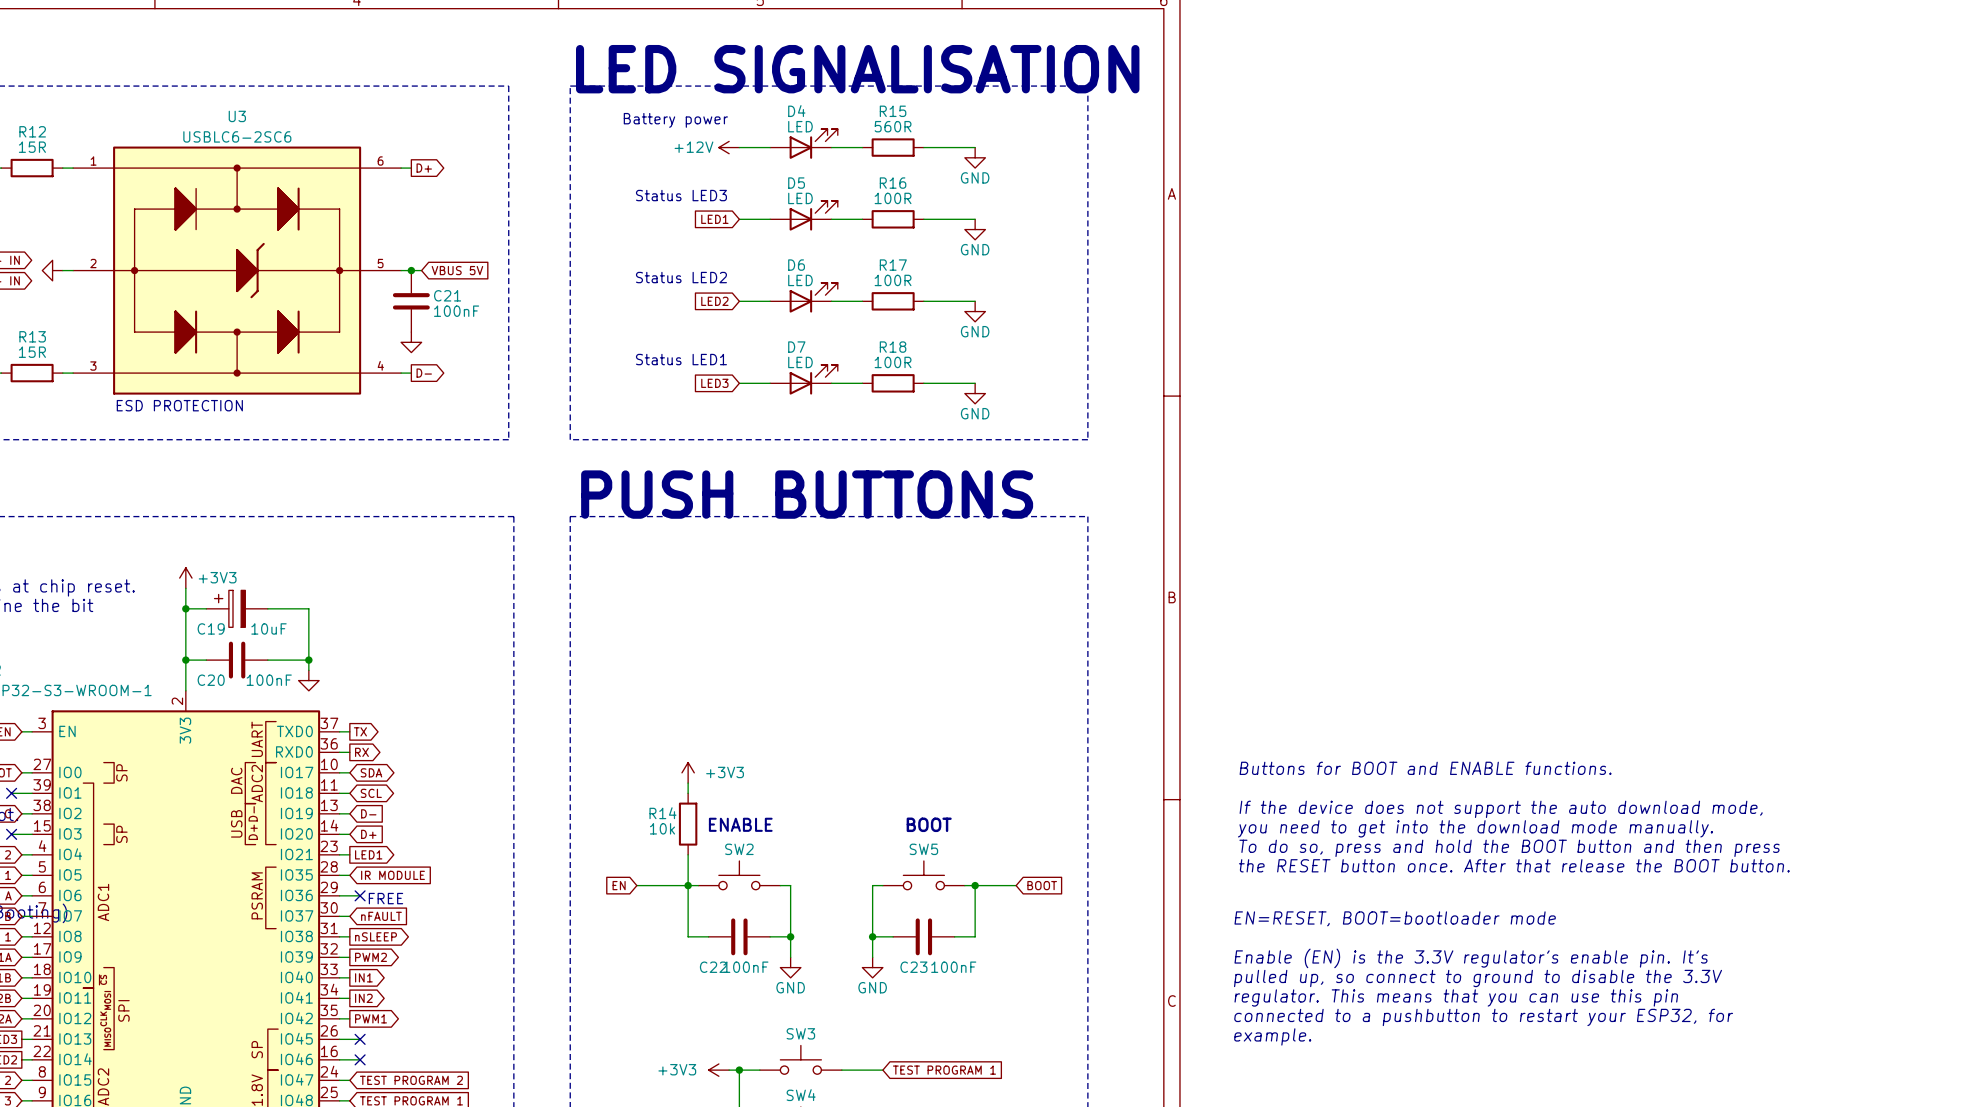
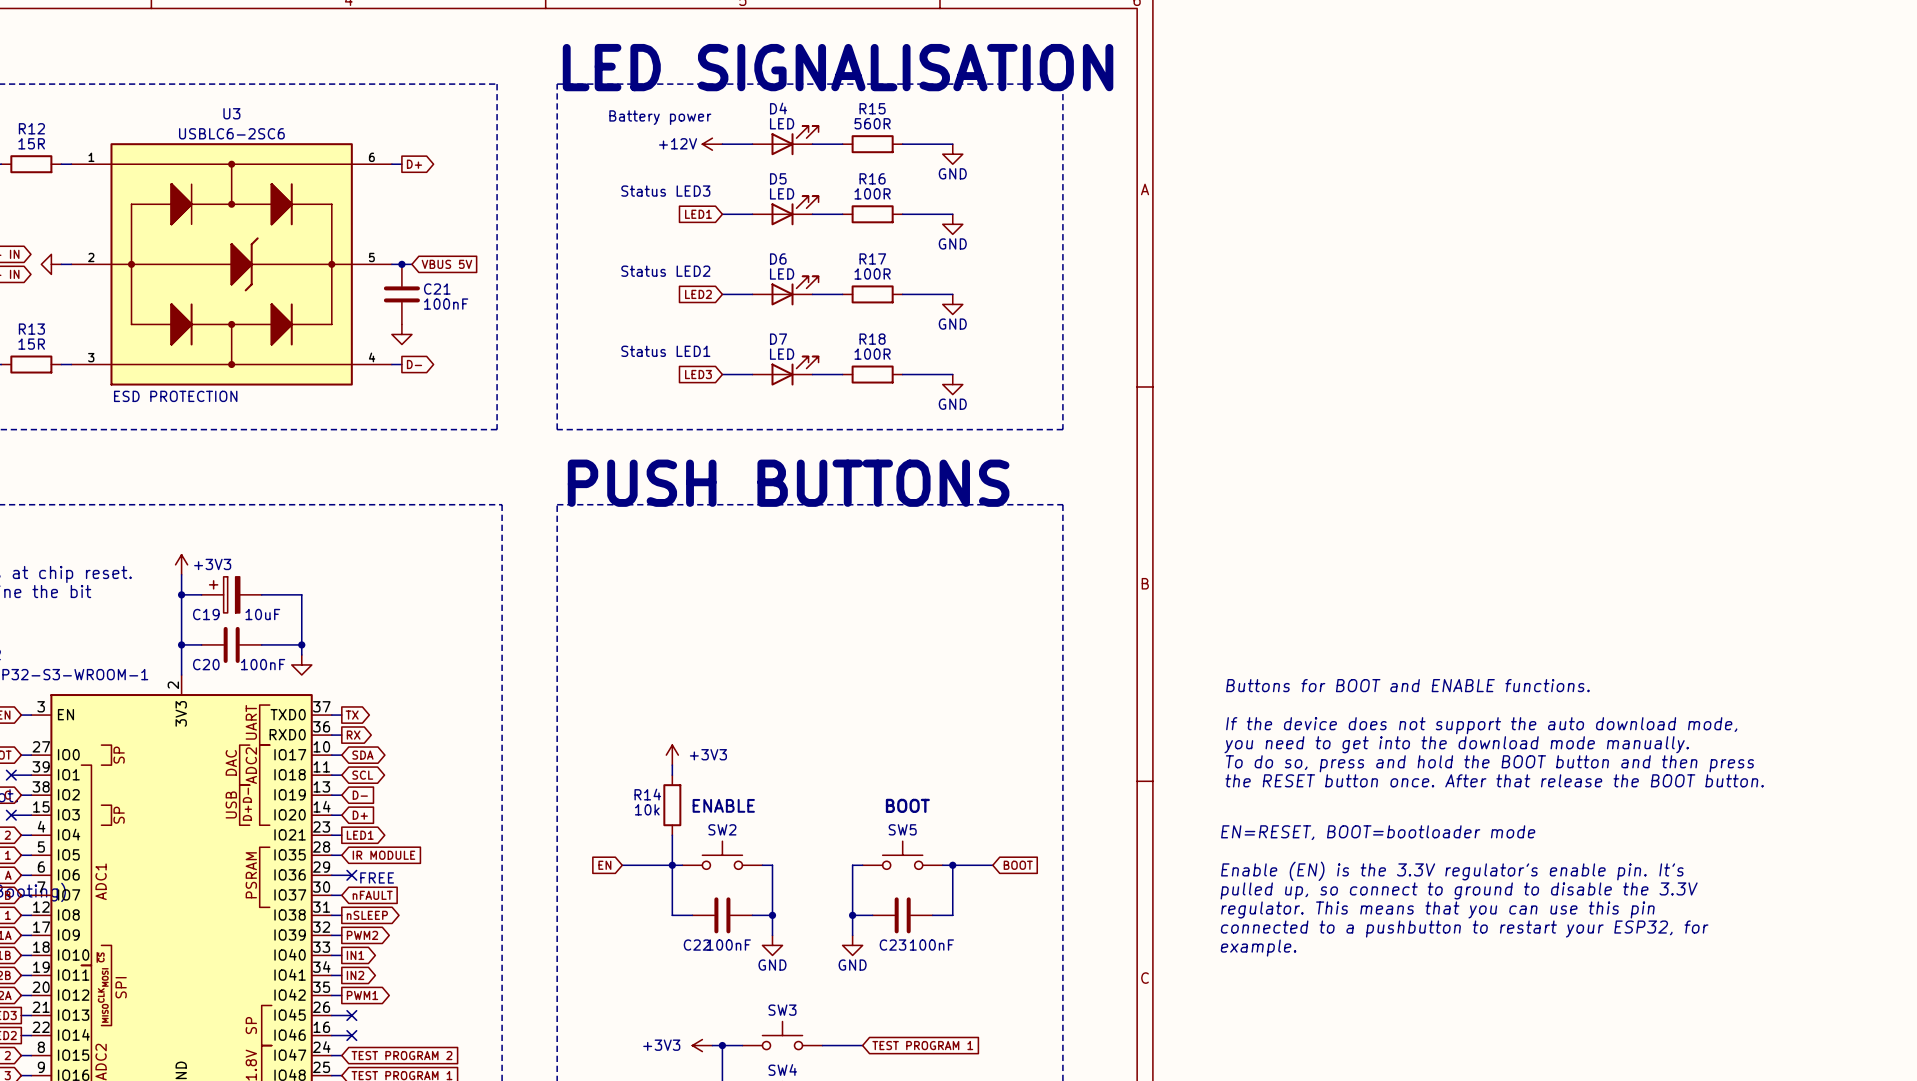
text position: Buttons for BOOT and ENABLE functions. (1425, 768) -> Buttons for BOOT and ENABLE functions. (1407, 685)
text position: If the device does not support the auto download mode, (1501, 809) -> If the device does not support the auto download mode, (1481, 725)
text position: you need to get into the download mode manually. (1475, 828) -> you need to get into the download mode manually. (1456, 744)
text position: To do so, press and hold the BOOT button and then press (1509, 848) -> To do so, press and hold the BOOT button and then press (1489, 763)
text position: the RESET button once. After that release the BOOT button. (1514, 865) -> the RESET button once. After that release the BOOT button. (1494, 780)
text position: EN=RESET, BOOT=bootloader mode (1395, 918) -> EN=RESET, BOOT=bootloader mode (1378, 832)
text position: Enable (EN) is the 3.3V regulator's enable pin. It's (1471, 958) -> Enable (EN) is the 3.3V regulator's enable pin. It's (1452, 871)
text position: pulled up, so connect to ground to disable the 3.3V (1478, 978) -> pulled up, so connect to ground to disable the 3.3V (1459, 890)
text position: regulator. This means that you can use this pin (1456, 997) -> regulator. This means that you can use this pin (1437, 909)
text position: connected to a pushbutton to restart your ESP32, for (1483, 1017) -> connected to a pushbutton to restart your ESP32, for (1464, 929)
text position: example. (1272, 1036) -> example. (1258, 948)

